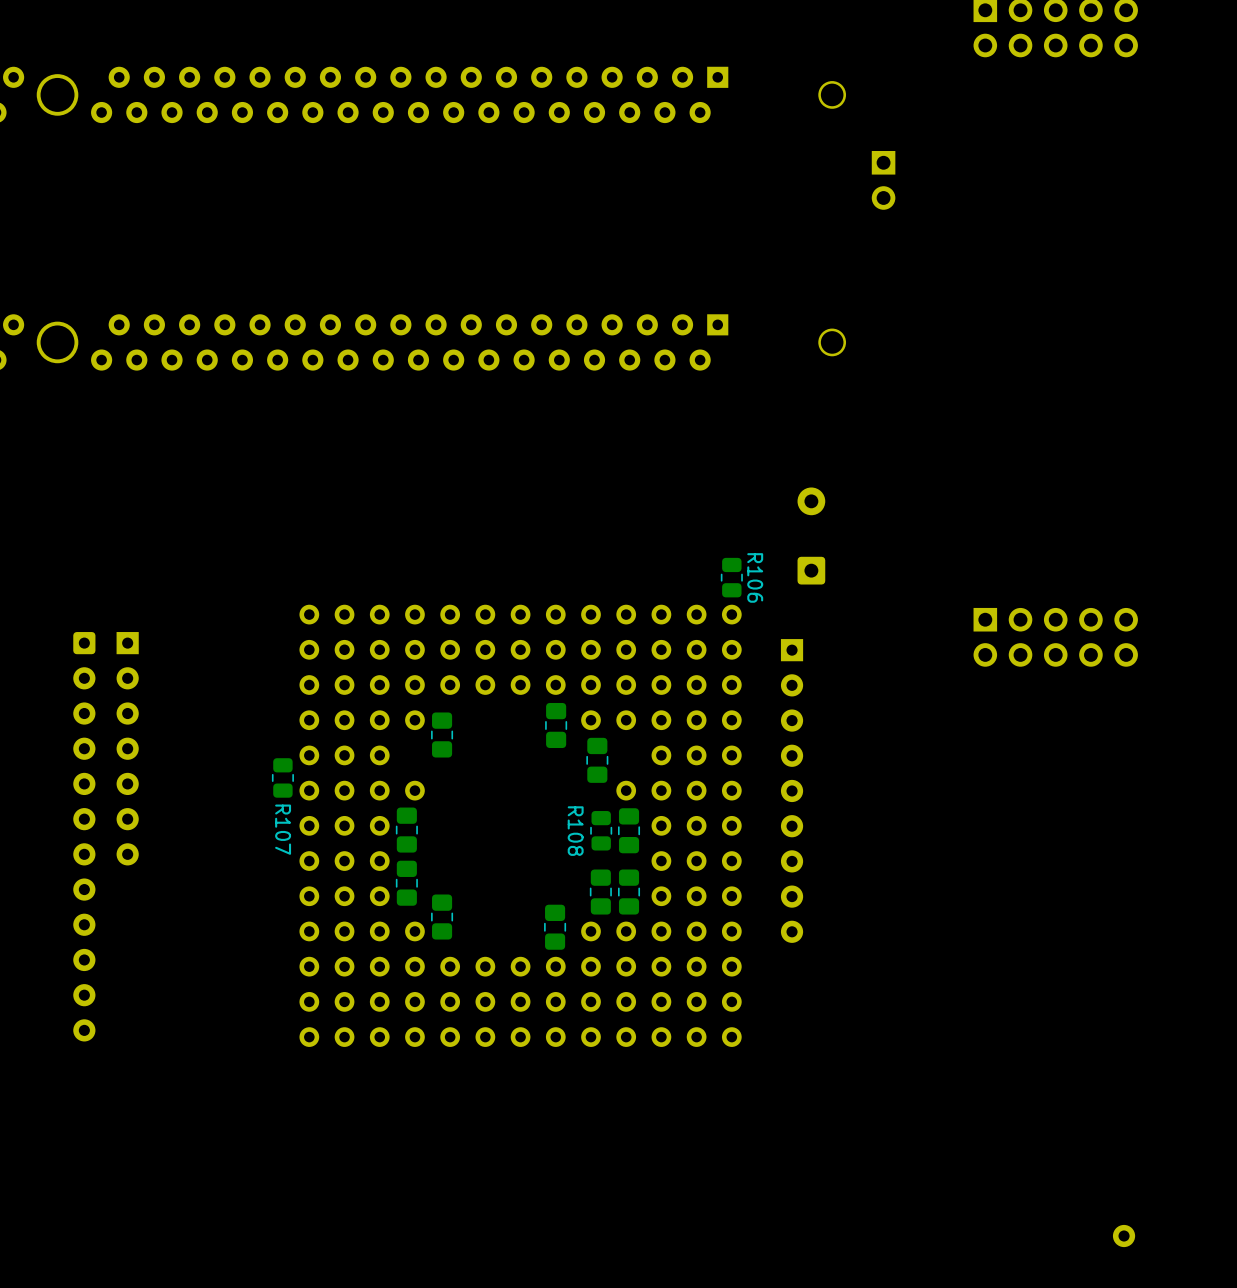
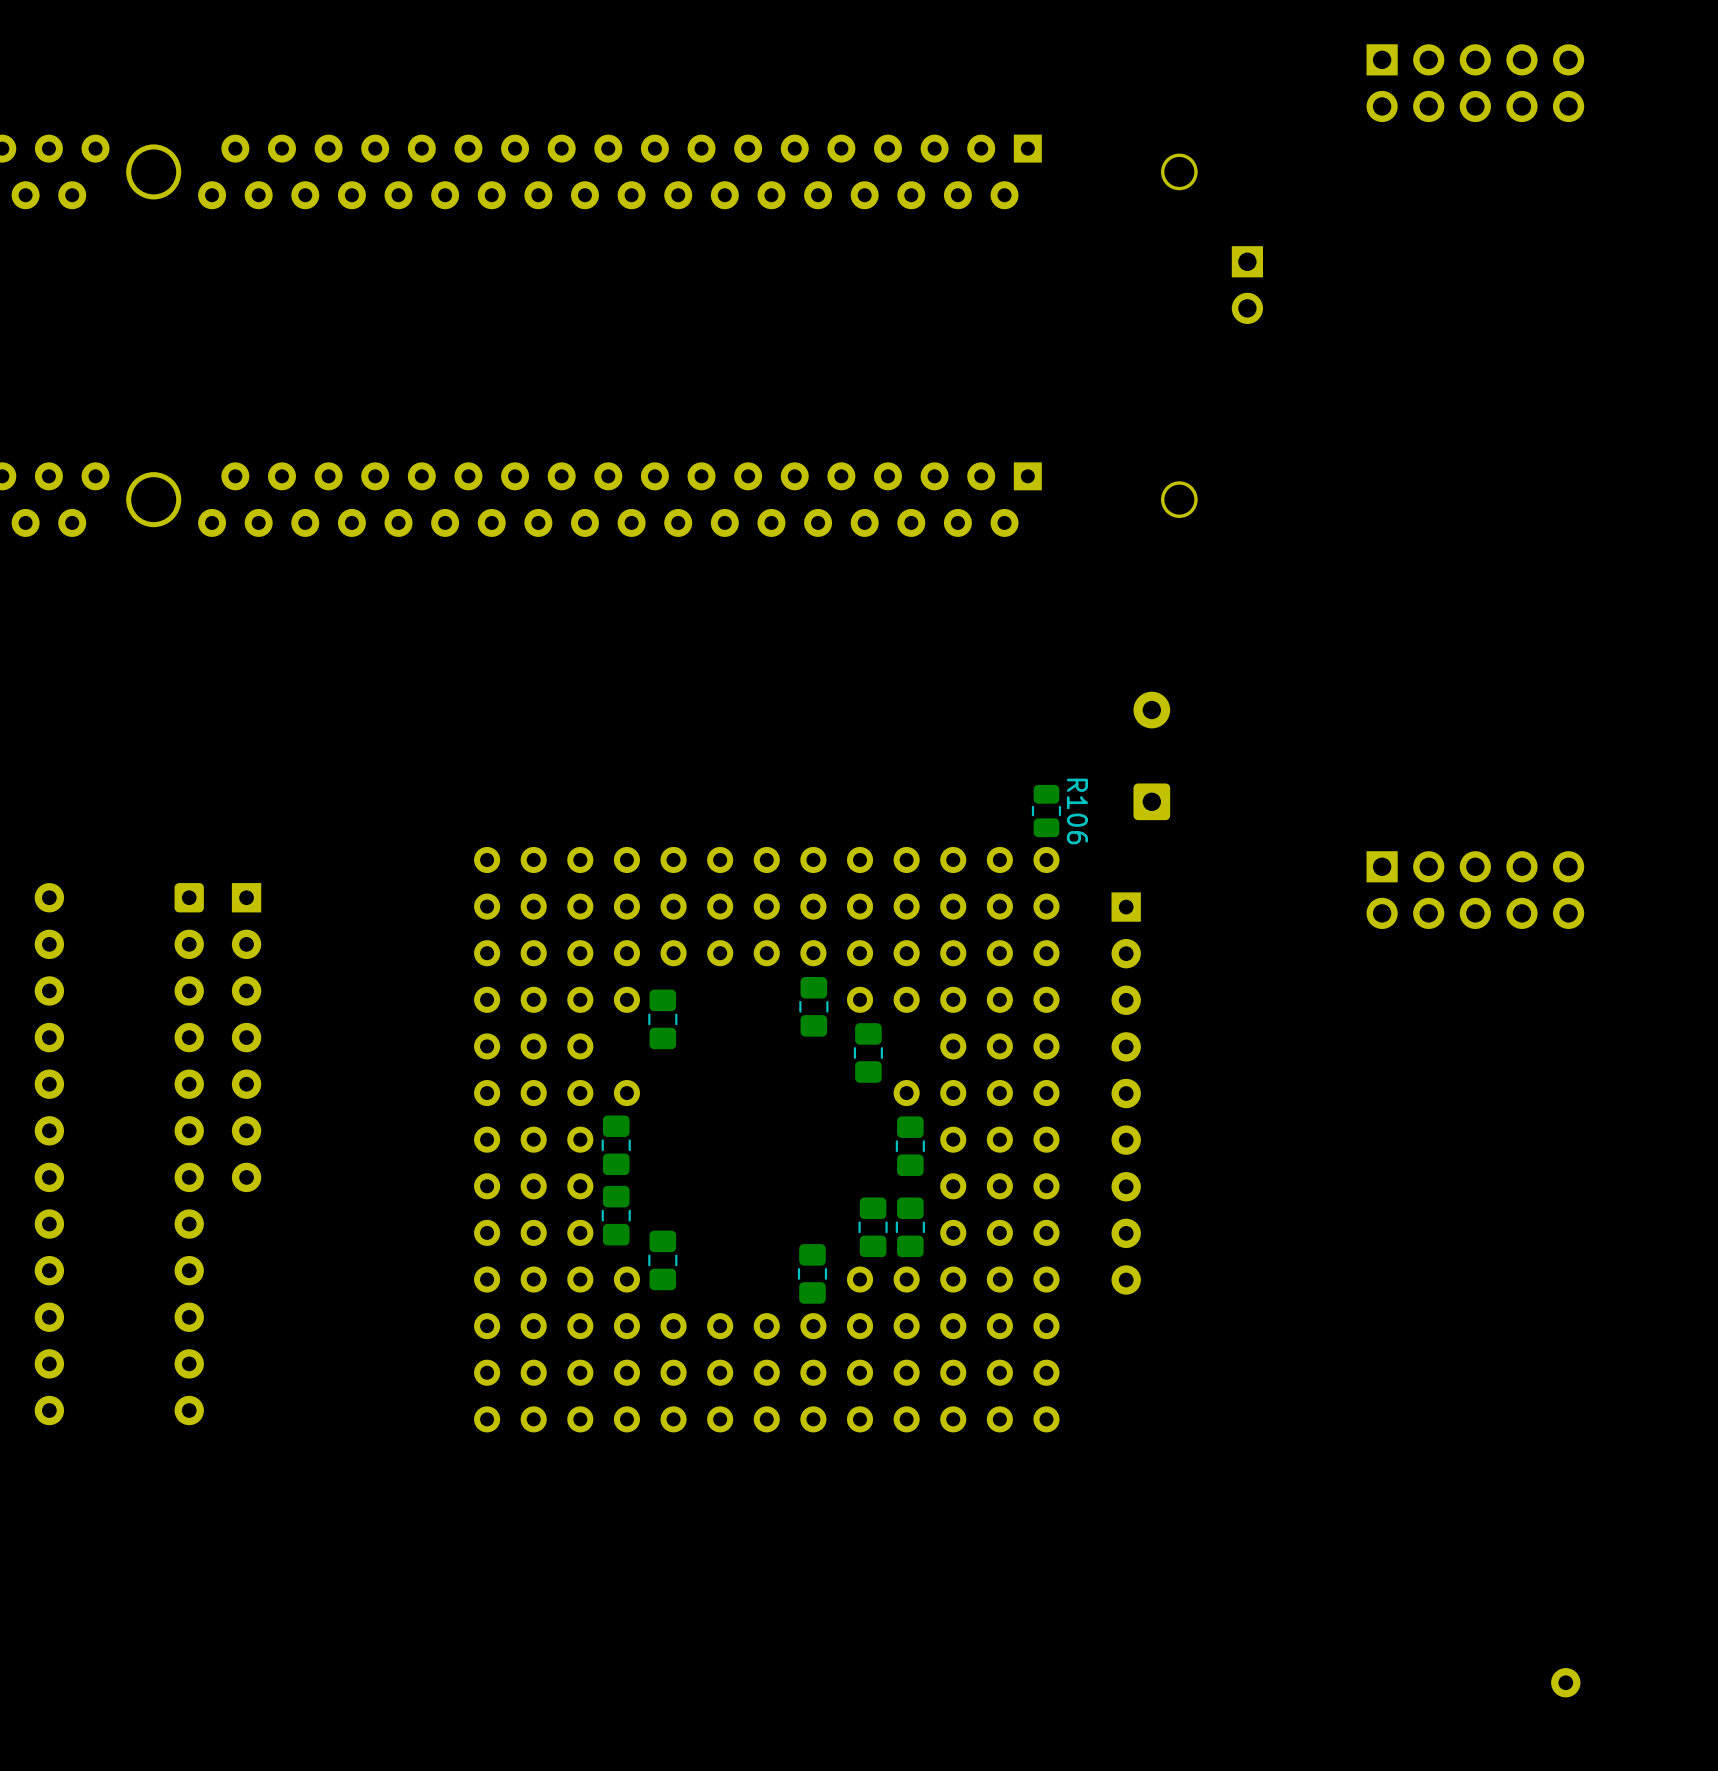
R107: (282, 777) -> none
R108: (601, 830) -> none

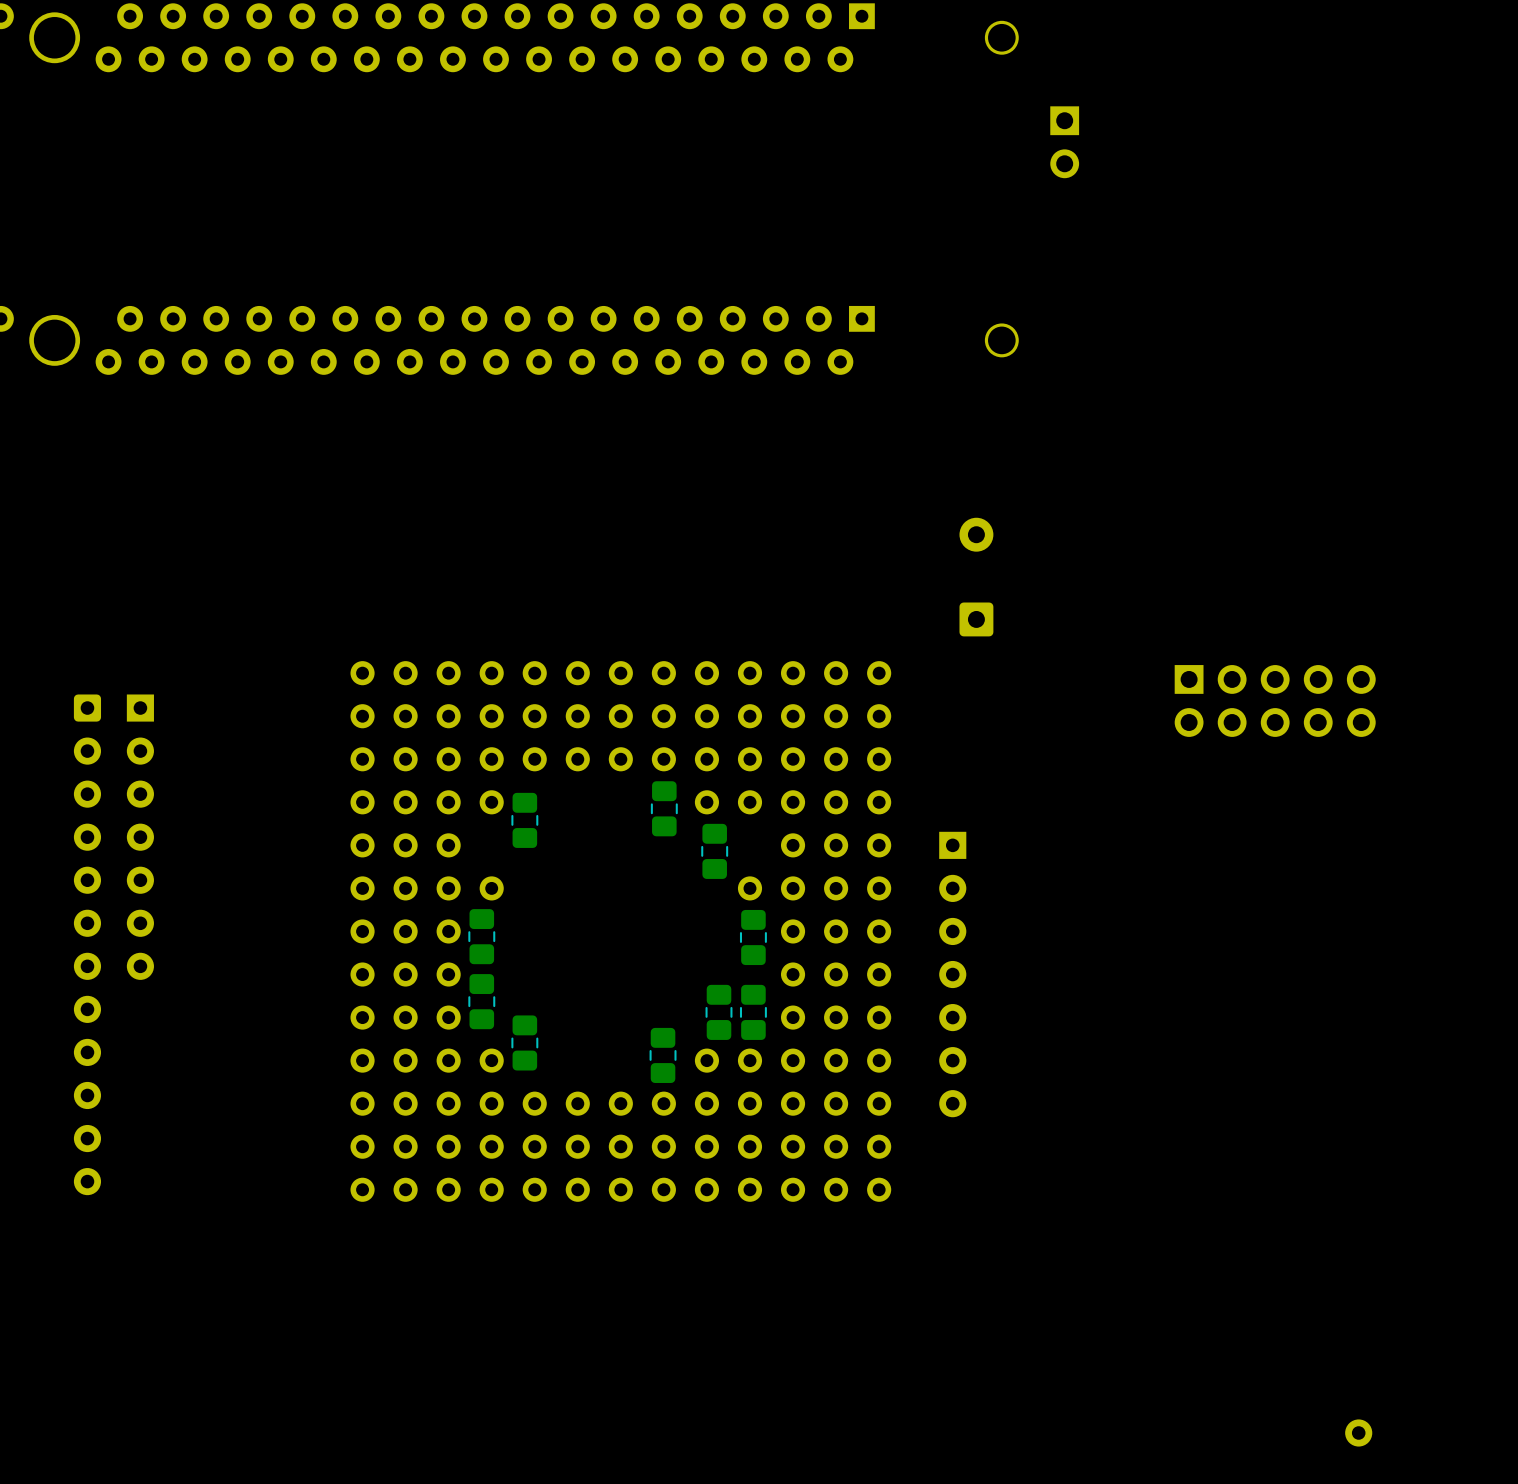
R106: (1046, 811) -> none
part: (1126, 1093) -> none
part: none -> (952, 974)

